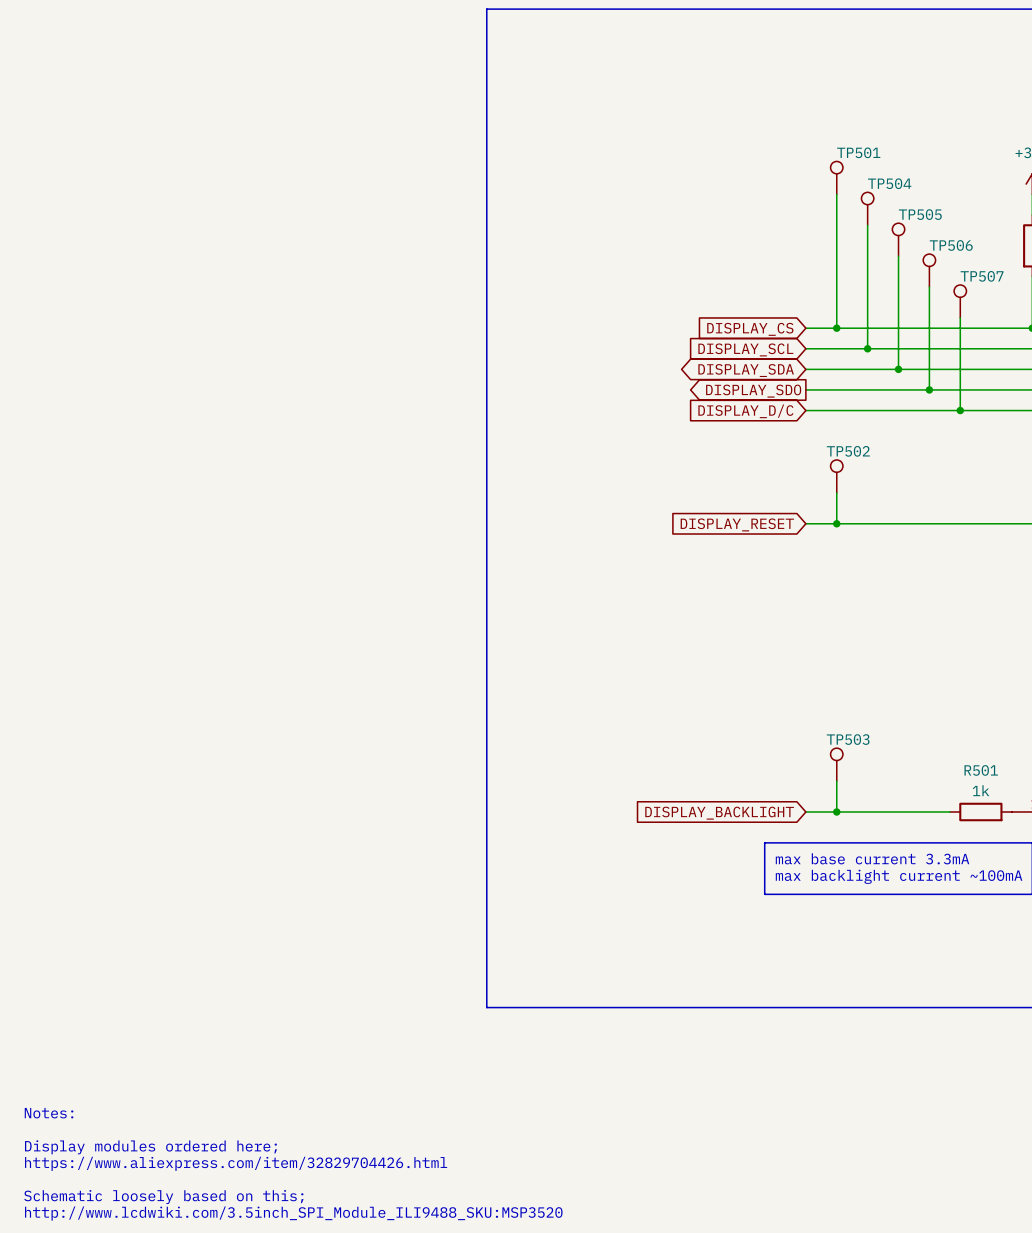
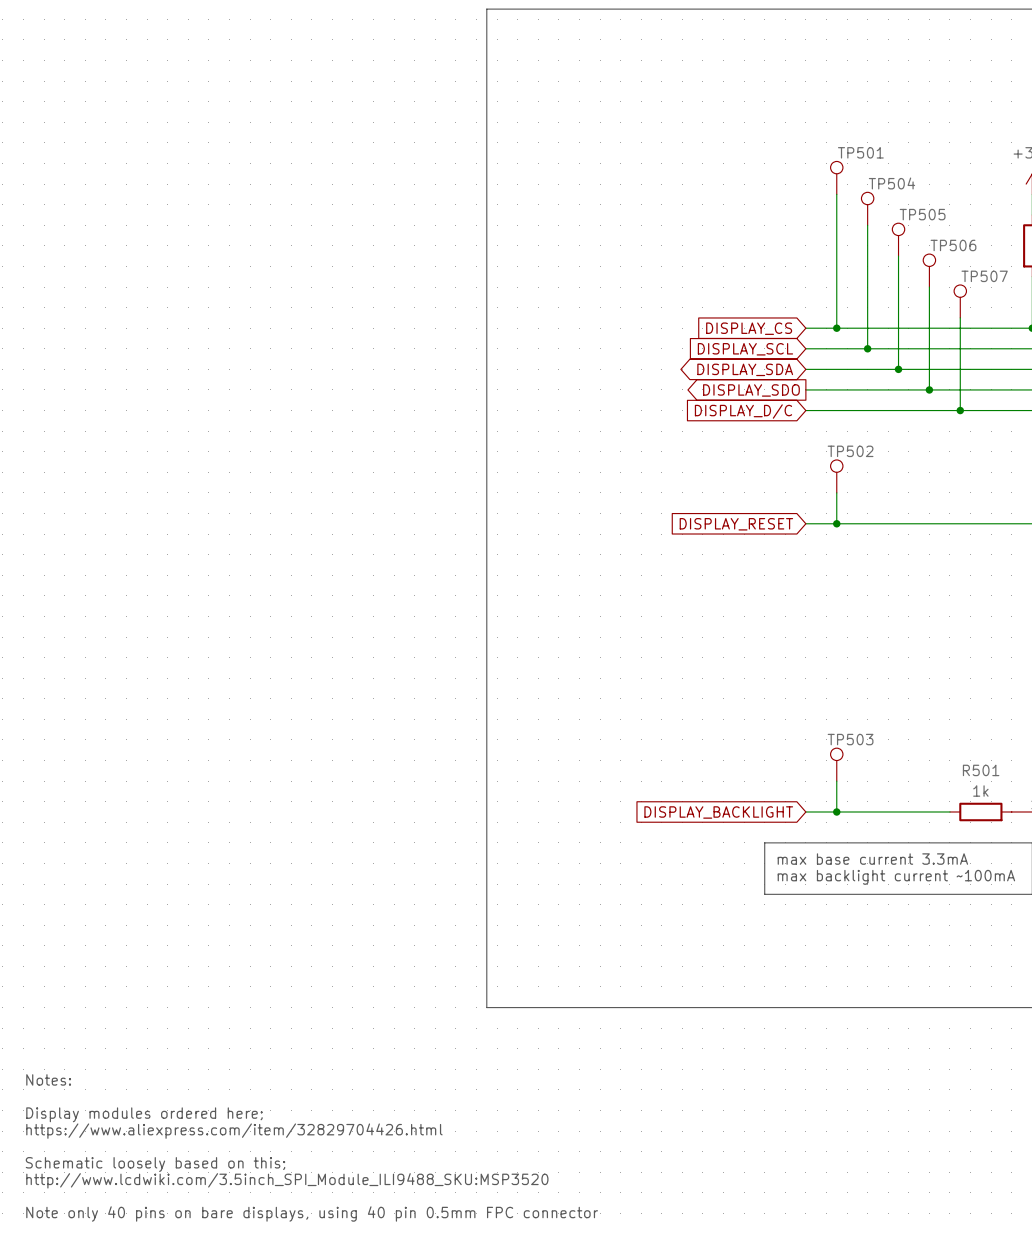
text: none -> Notes: (48, 1079)
text: Notes: (49, 1113) -> Display modules ordered here; (144, 1114)
text: none -> https://www.aliexpress.com/item/32829704426.html (234, 1131)
text: Display modules ordered here; (151, 1147) -> none
text: https://www.aliexpress.com/item/32829704426.html (236, 1163) -> Schematic loosely based on this; (155, 1164)
text: none -> http://www.lcdwiki.com/3.5inch_SPI_Module_ILI9488_SKU:MSP3520 (287, 1180)
text: Schematic loosely based on this; (163, 1197) -> none
text: http://www.lcdwiki.com/3.5inch_SPI_Module_ILI9488_SKU:MSP3520 (293, 1213) -> Note only 40 pins on bare displays, using 40 pin 0.5mm FPC connector (312, 1213)

